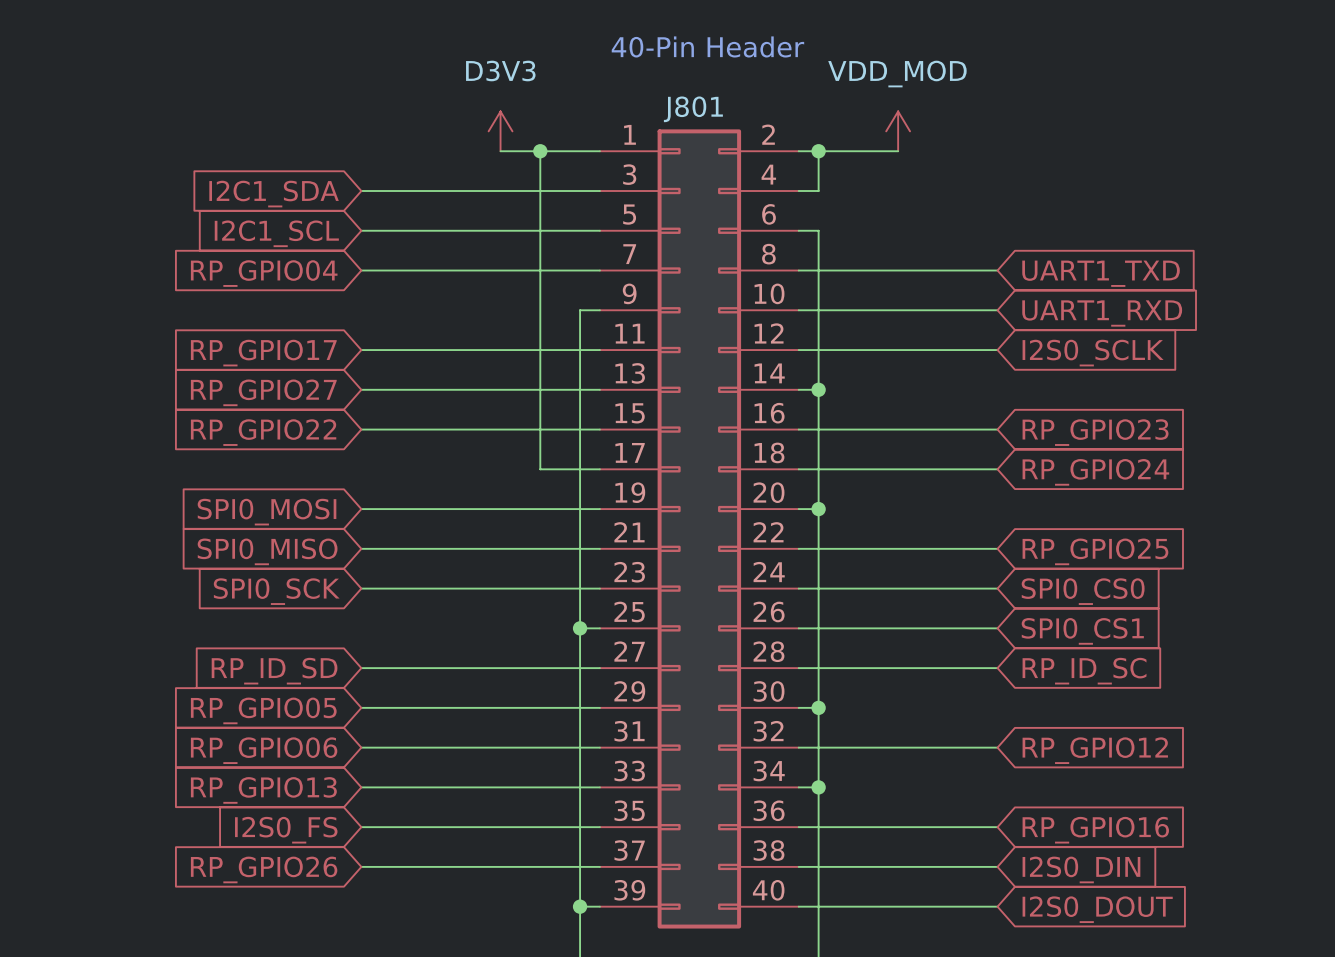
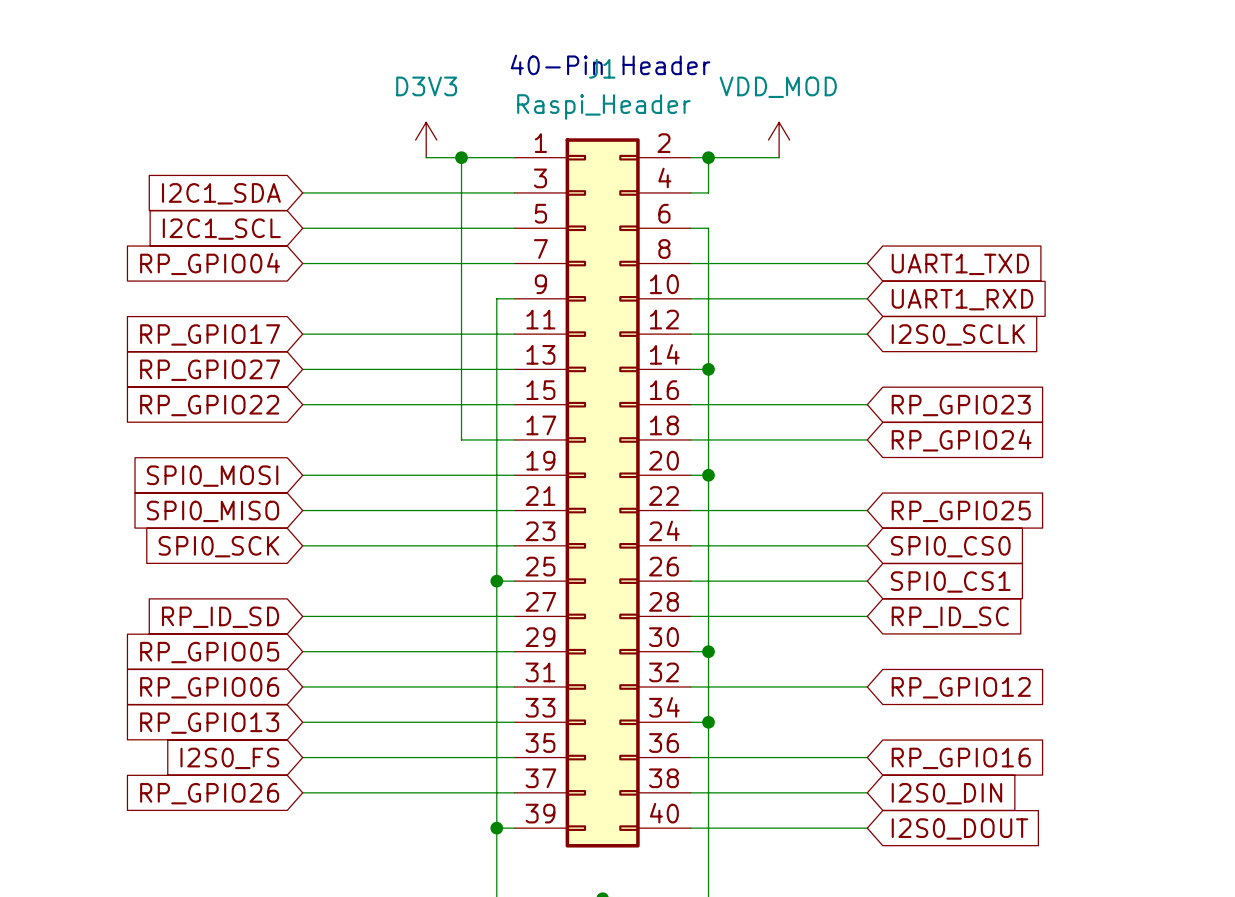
J801 value: none -> Raspi_Header (603, 107)
J801 name: J801 (693, 109) -> J1 (602, 68)

